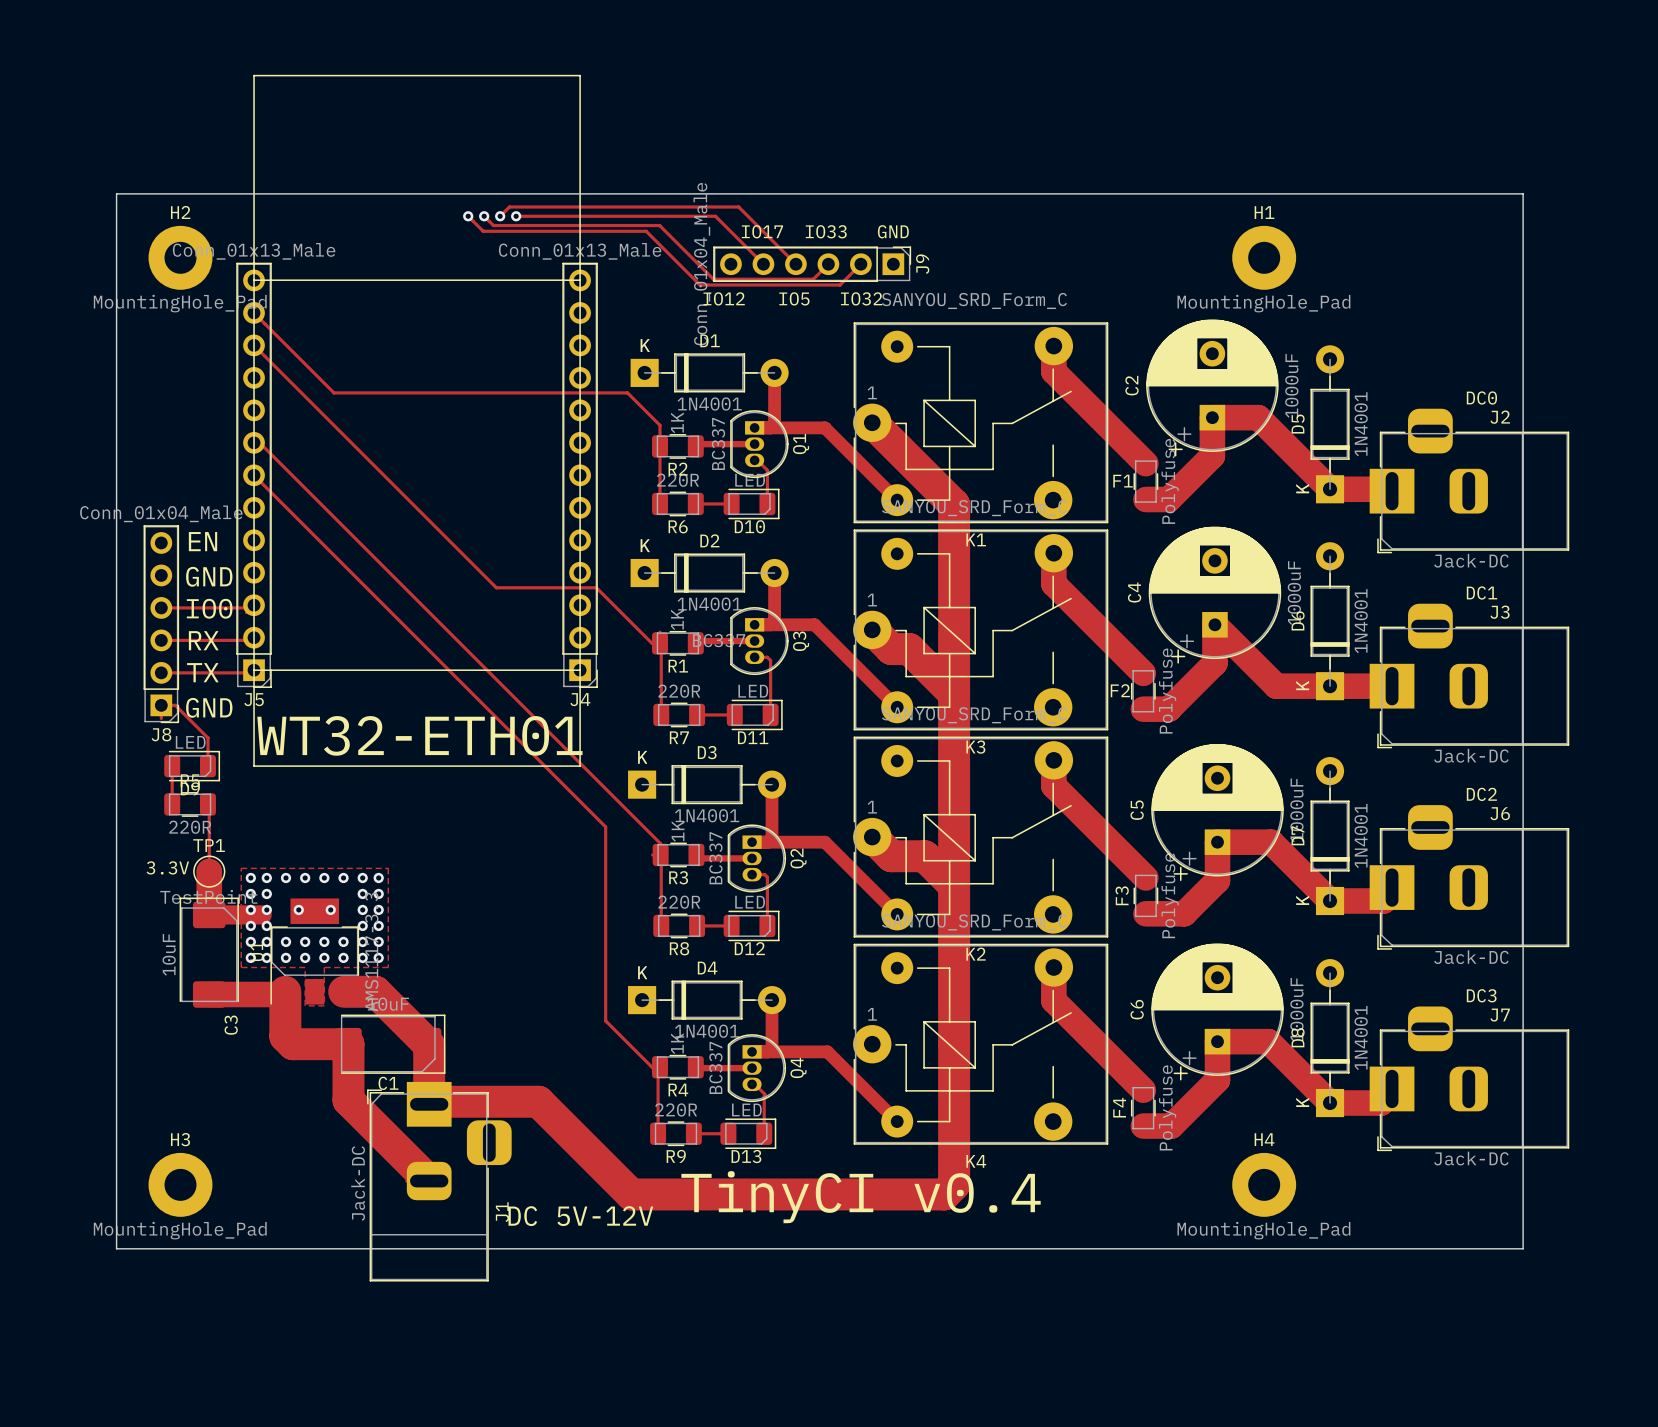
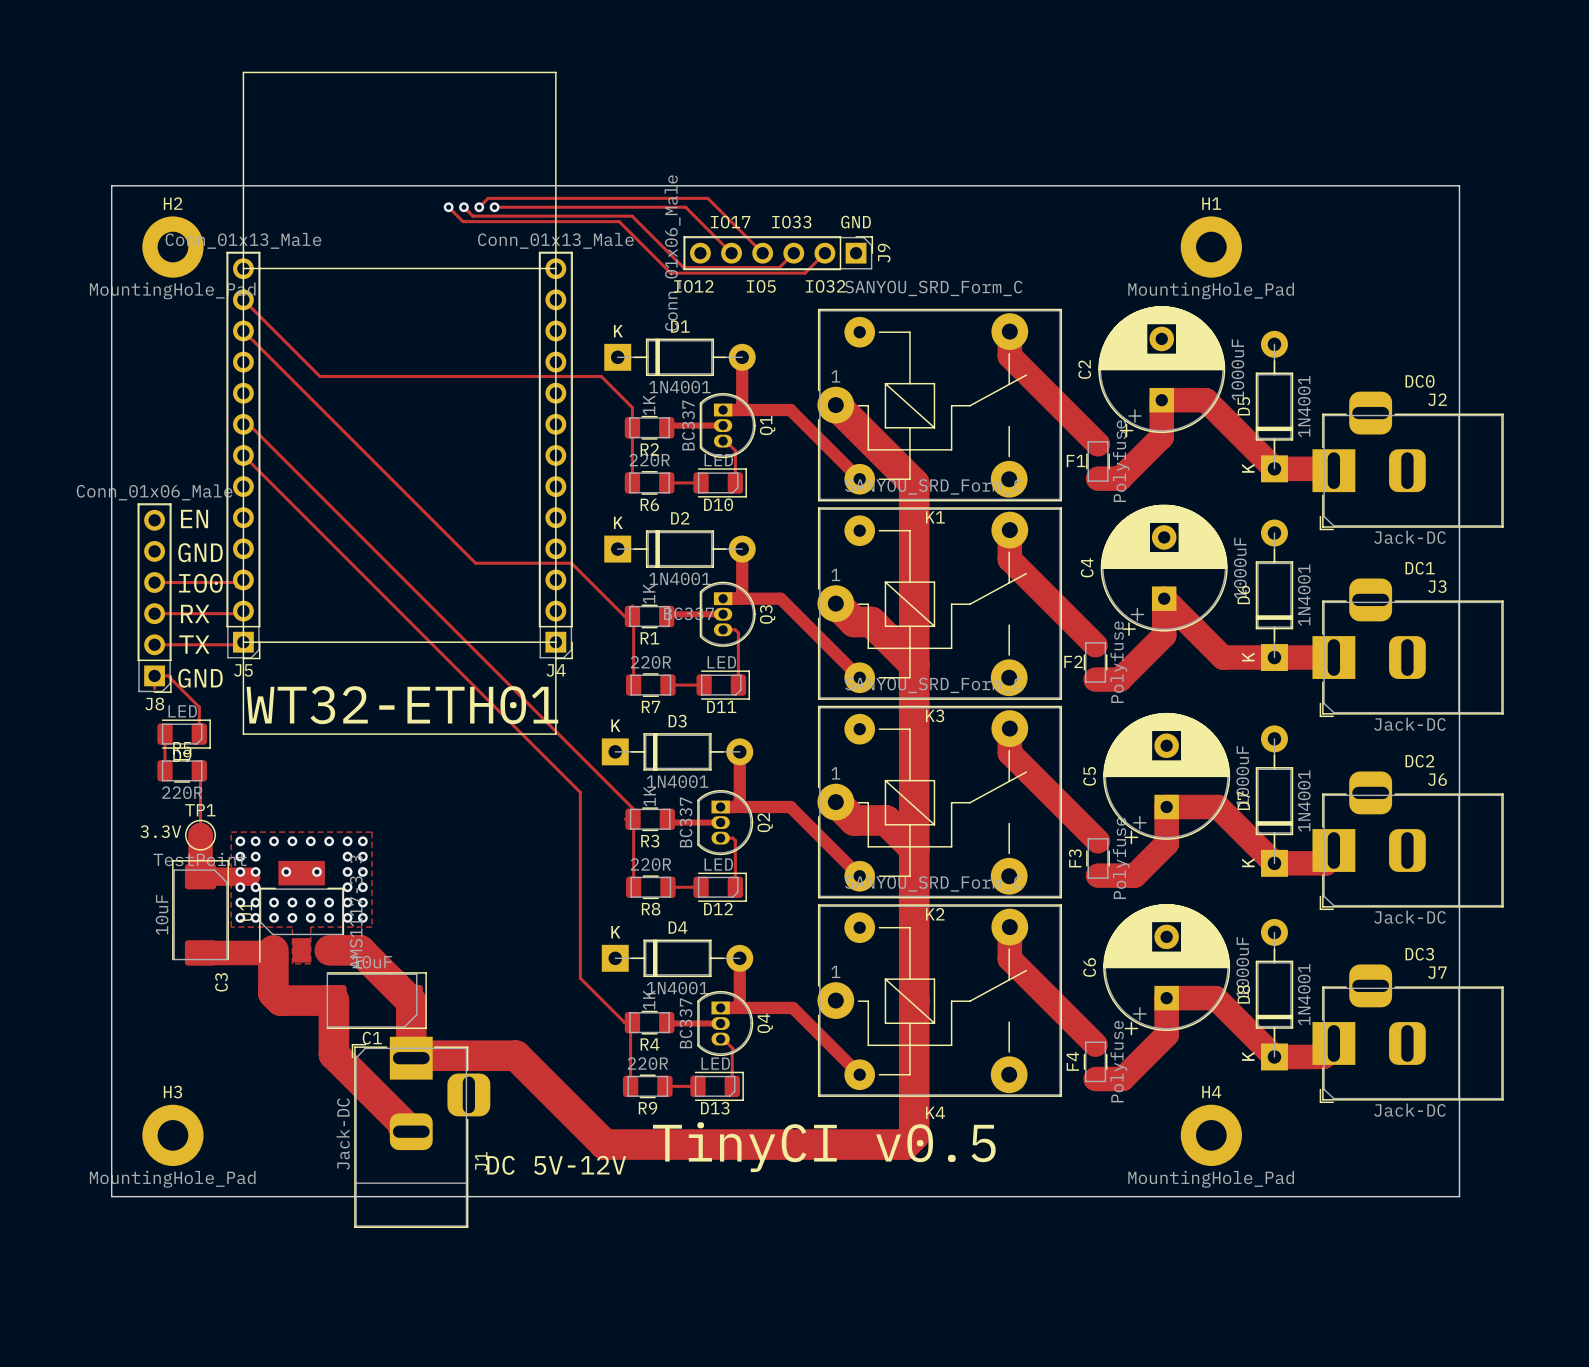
J9 value: Conn_01x04_Male (701, 264) -> Conn_01x06_Male (672, 253)
J8 value: Conn_01x04_Male (161, 513) -> Conn_01x06_Male (154, 492)
text: TinyCI v0.4 (861, 1197) -> TinyCI v0.5 (824, 1147)

